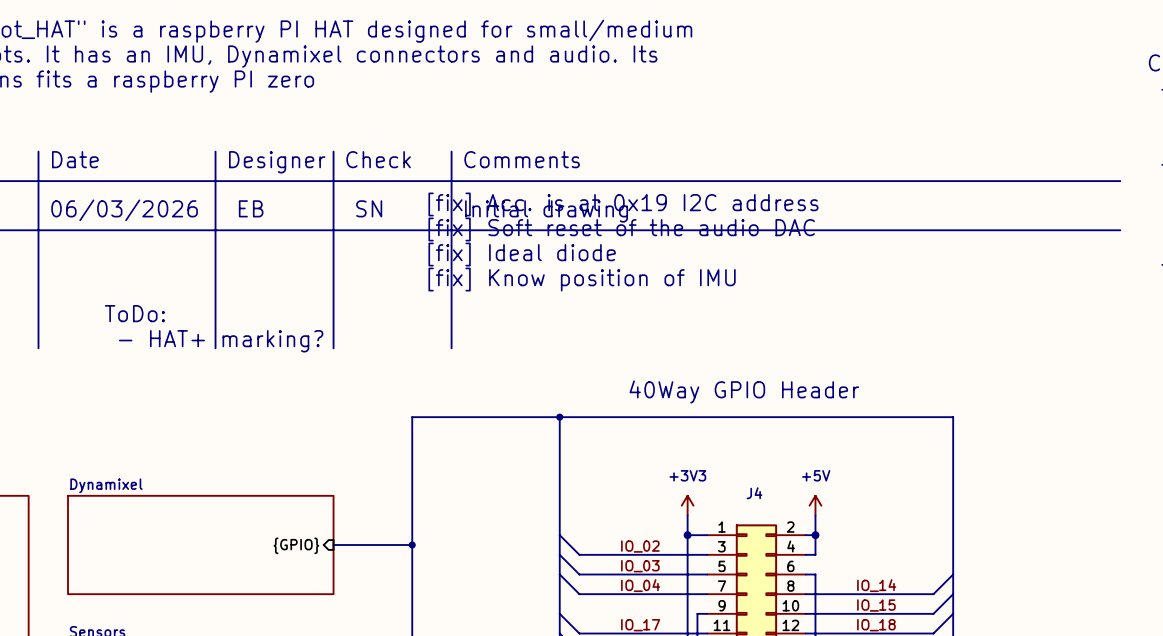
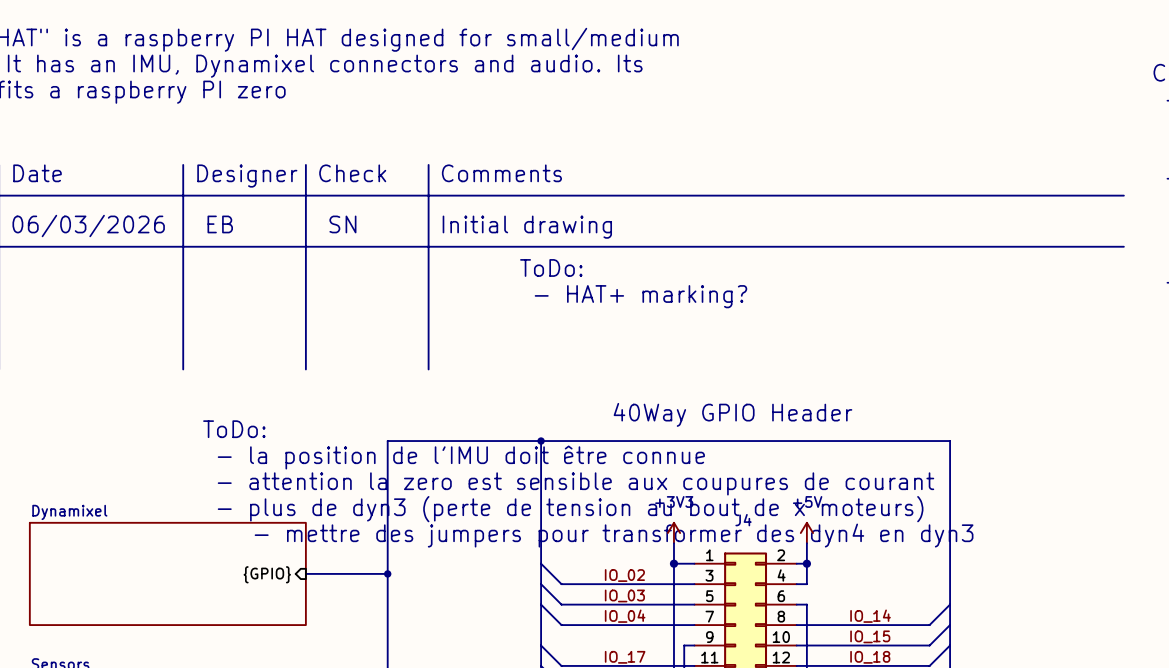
text: [fix] Acc. is at 0x19 I2C address (623, 204) -> none
text: [fix] Soft reset of the audio DAC (621, 229) -> none
text: none -> ToDo: (551, 267)
text: [fix] Ideal diode (522, 254) -> none
text: none -> - HAT+ marking? (640, 296)
text: [fix] Know position of IMU (582, 279) -> none
text: ToDo: (134, 313) -> none
text: - HAT+ marking? (221, 341) -> none
text: none -> ToDo: (234, 429)
text: none -> - la position de l'IMU doit être connue (461, 457)
text: none -> - attention la zero est sensible aux coupures de courant (575, 483)
text: none -> - plus de dyn3 (perte de tension au bout de x moteurs) (570, 509)
text: none -> - mettre des jumpers pour transformer des dyn4 en dyn3 (614, 535)

